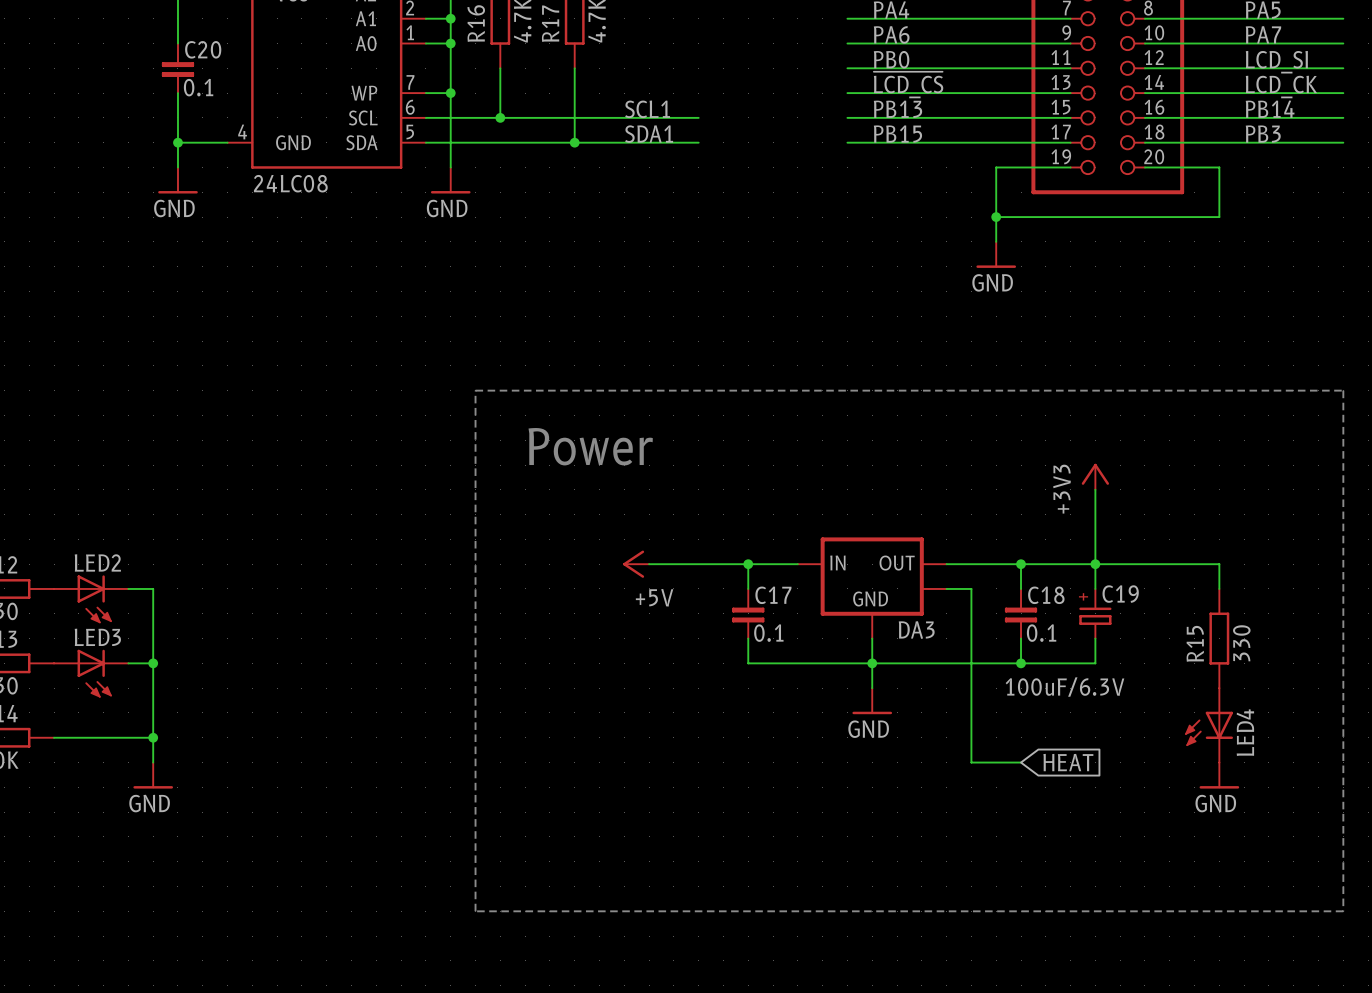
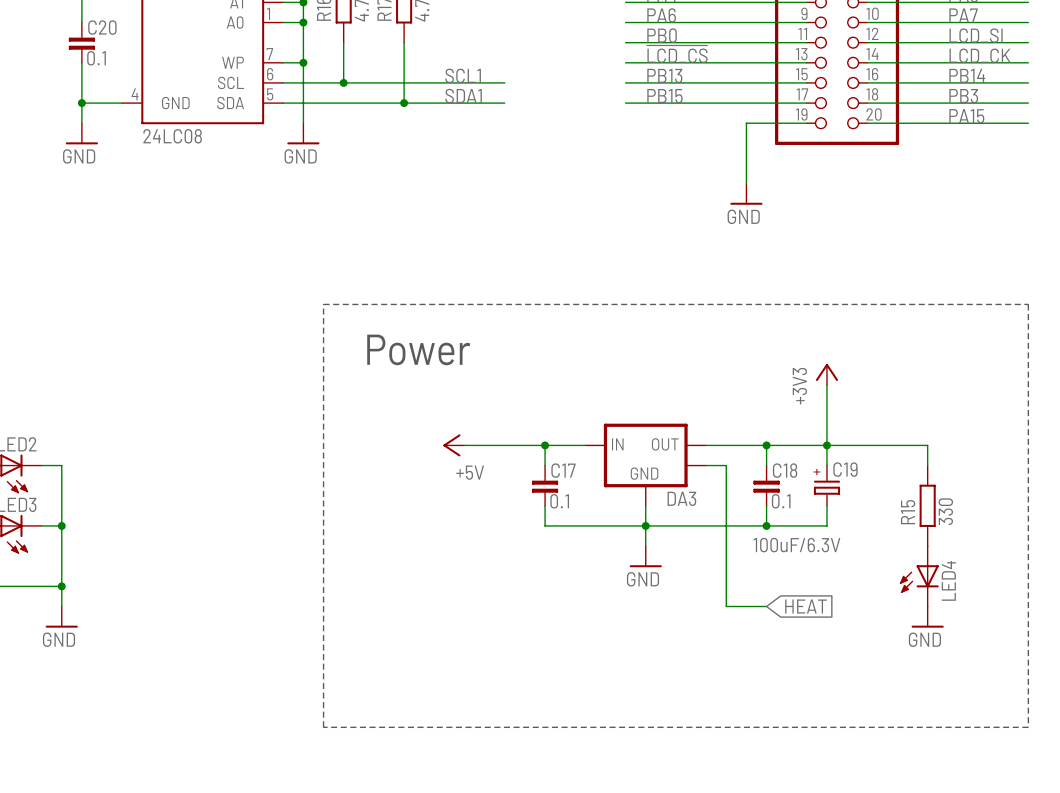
label: none -> PA15 (966, 116)
wire: (1219, 167) (1219, 217) (996, 217) -> (927, 123) (1028, 123)
junction: (996, 217) -> none

